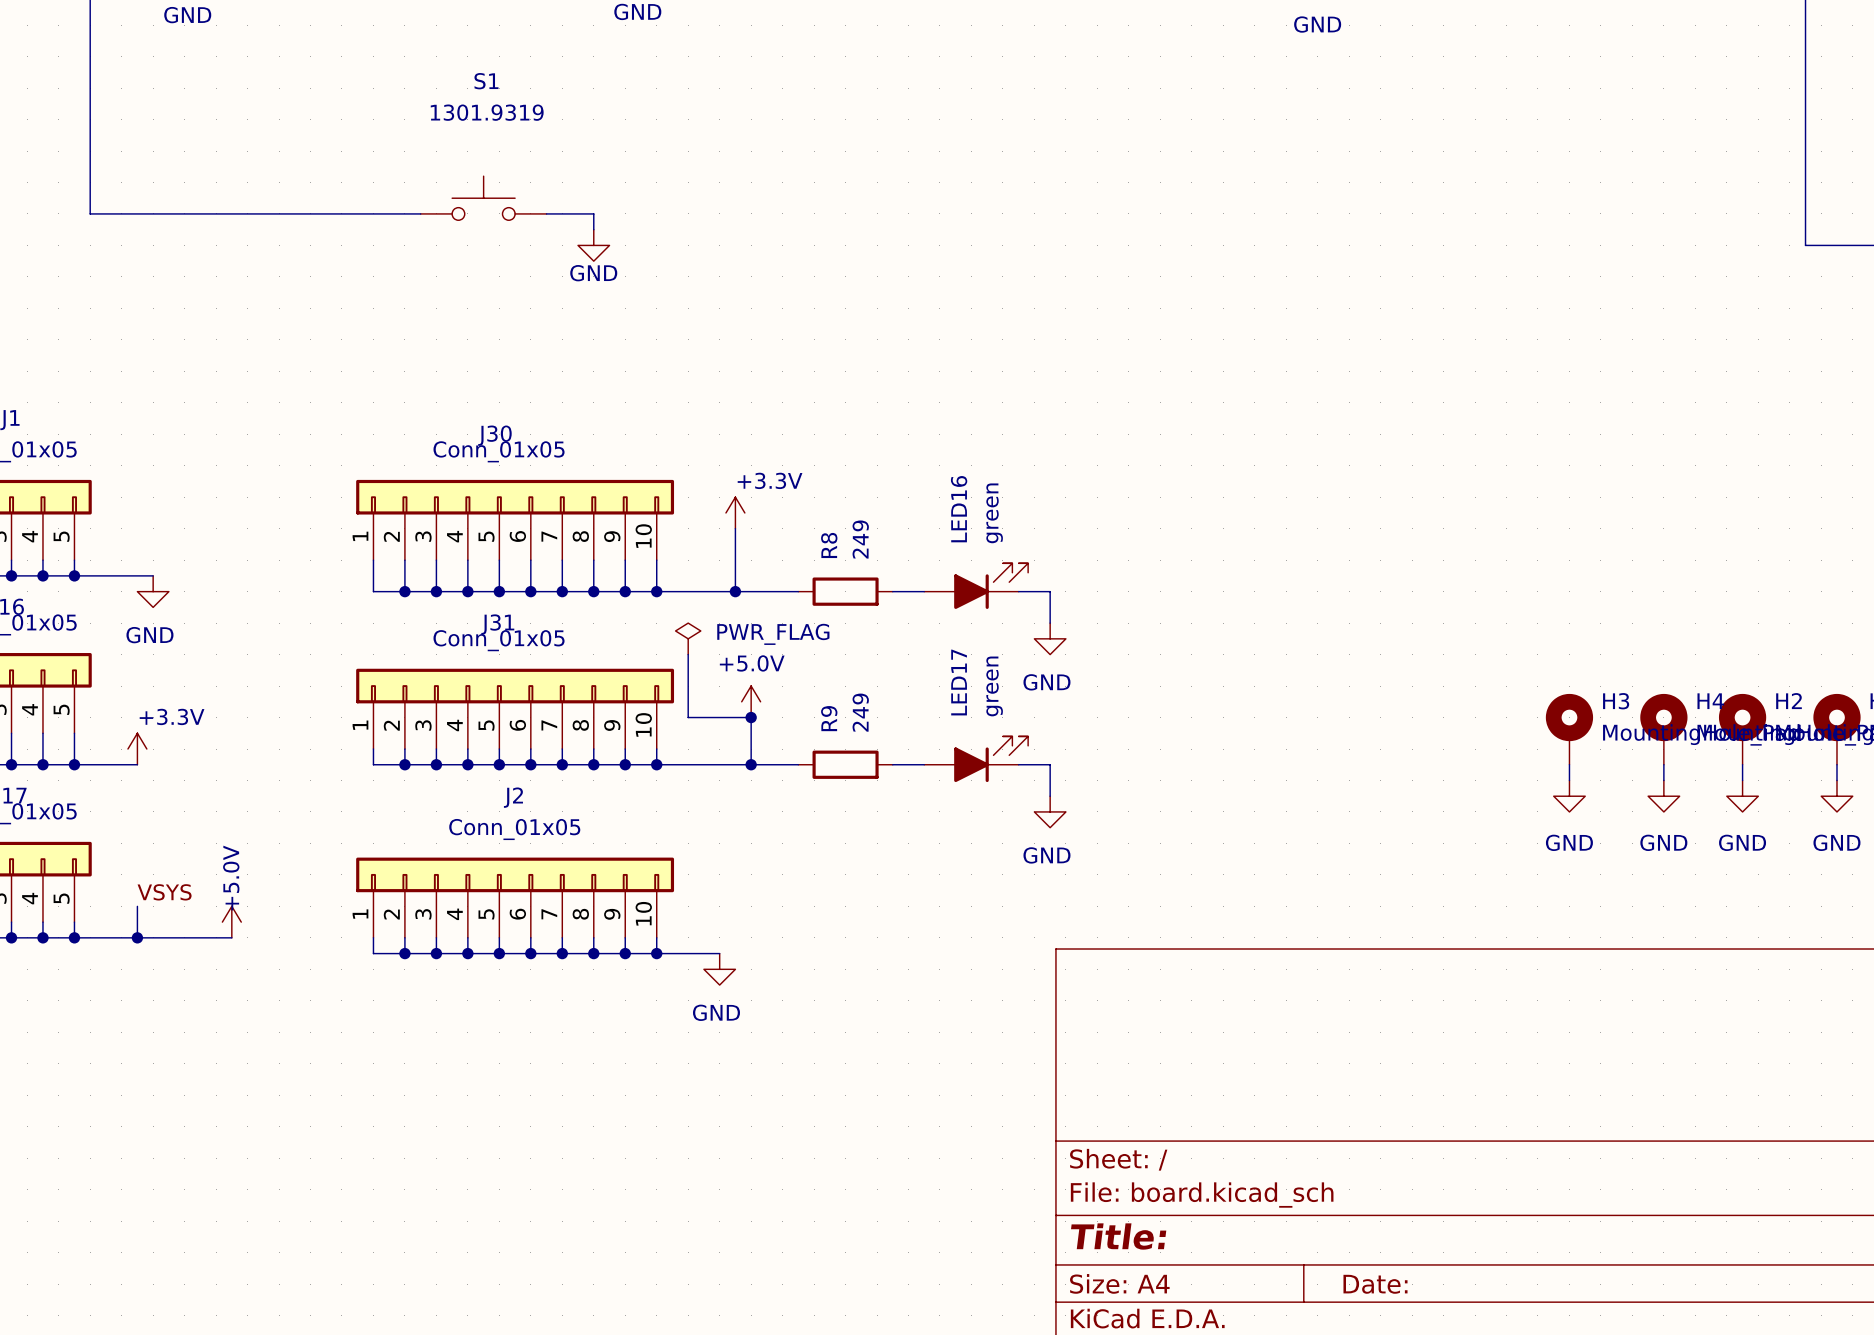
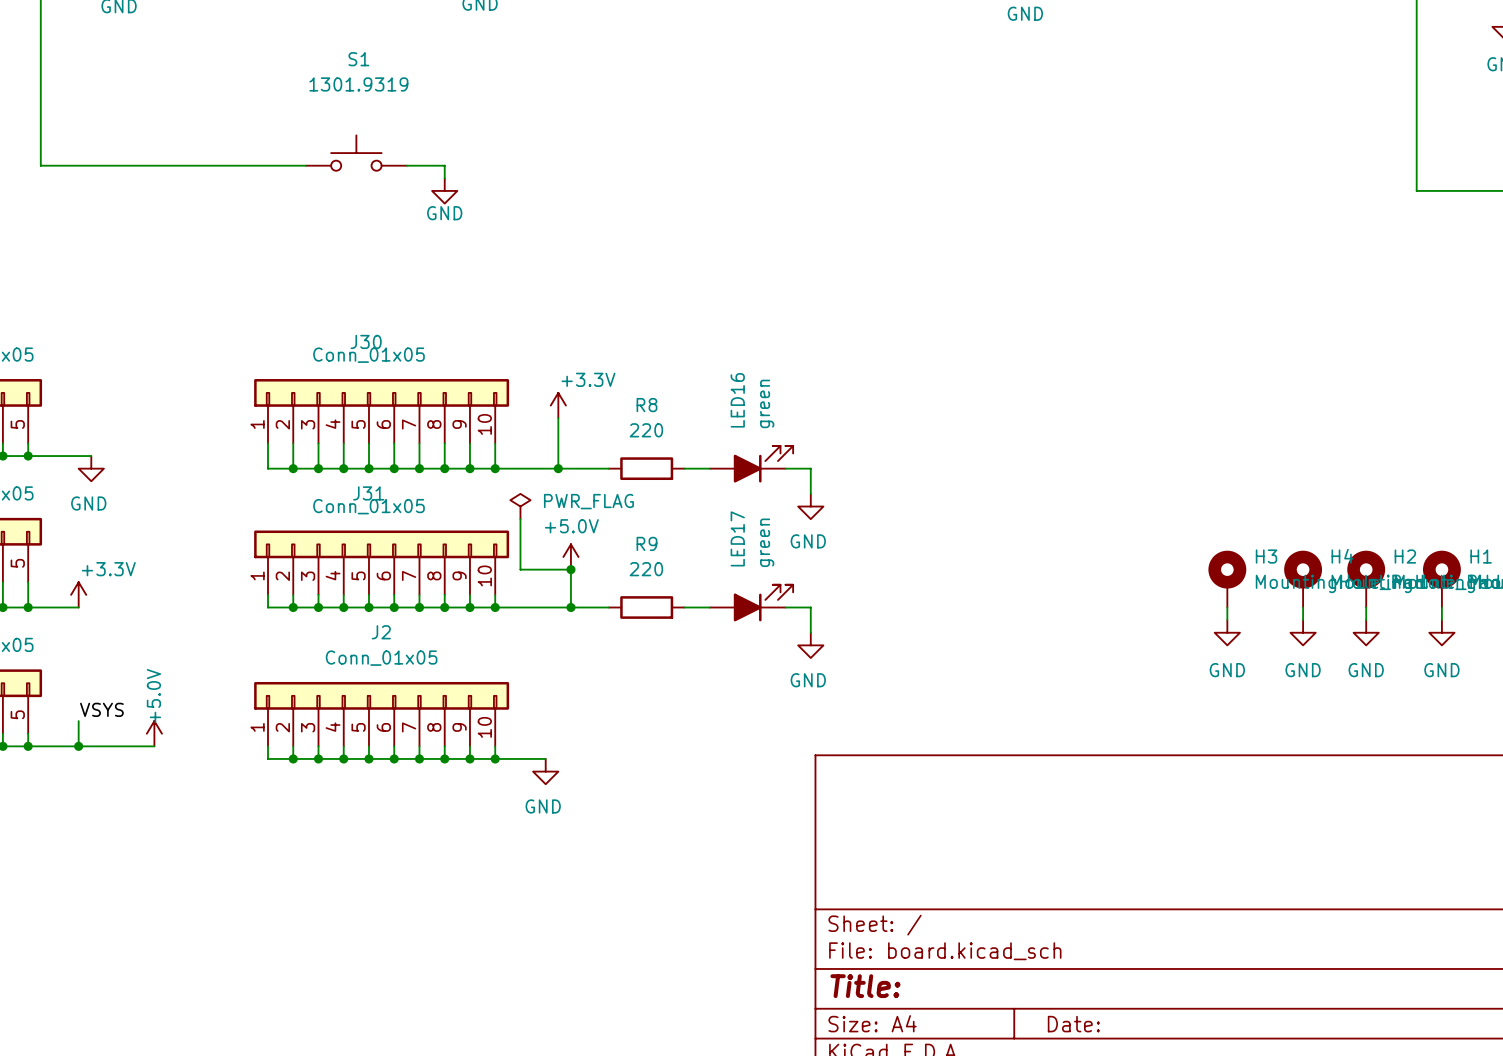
R8 value: 249 (860, 539) -> 220 (646, 430)
R8 name rotation: 0° (829, 545) -> 90° clockwise (646, 405)
R9 value: 249 (860, 712) -> 220 (646, 569)
R9 name rotation: 0° (829, 718) -> 90° clockwise (646, 543)

